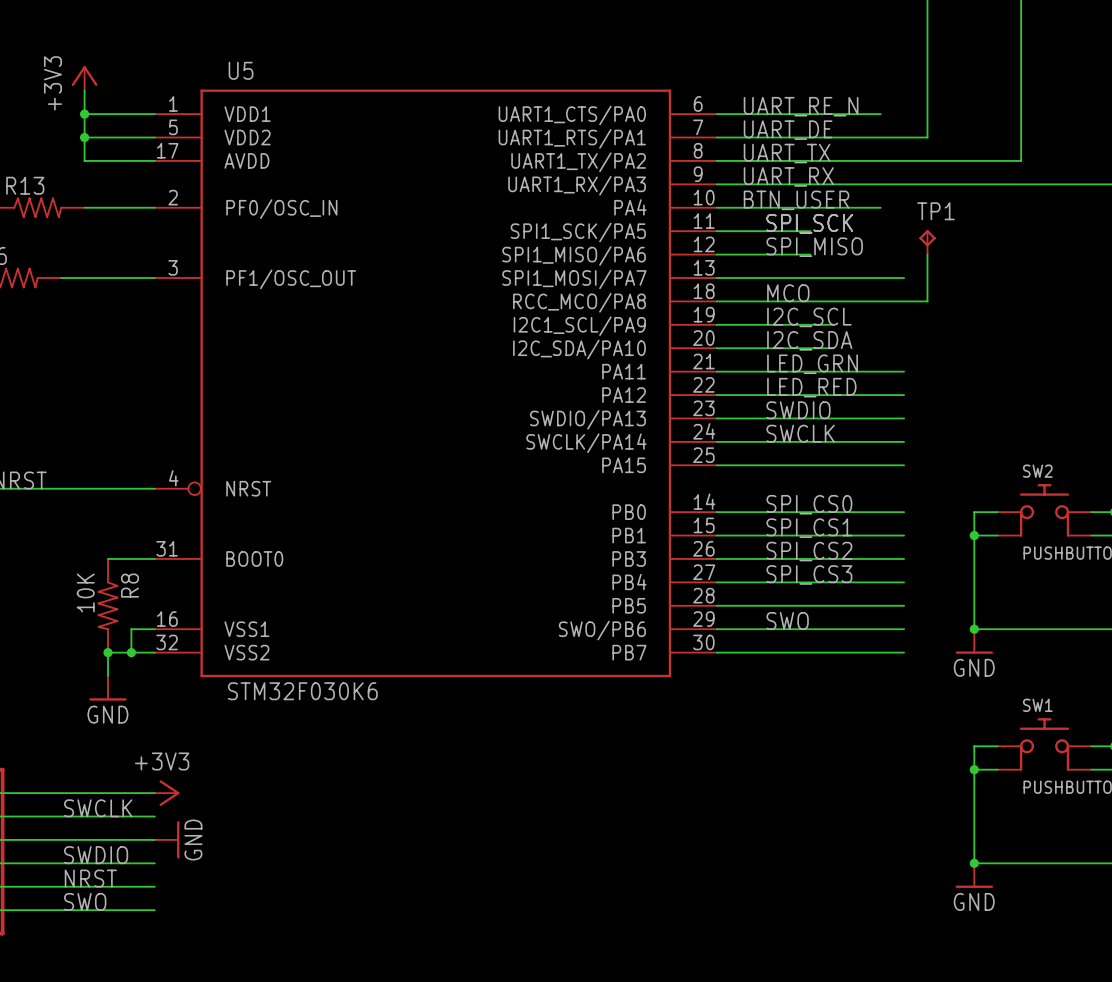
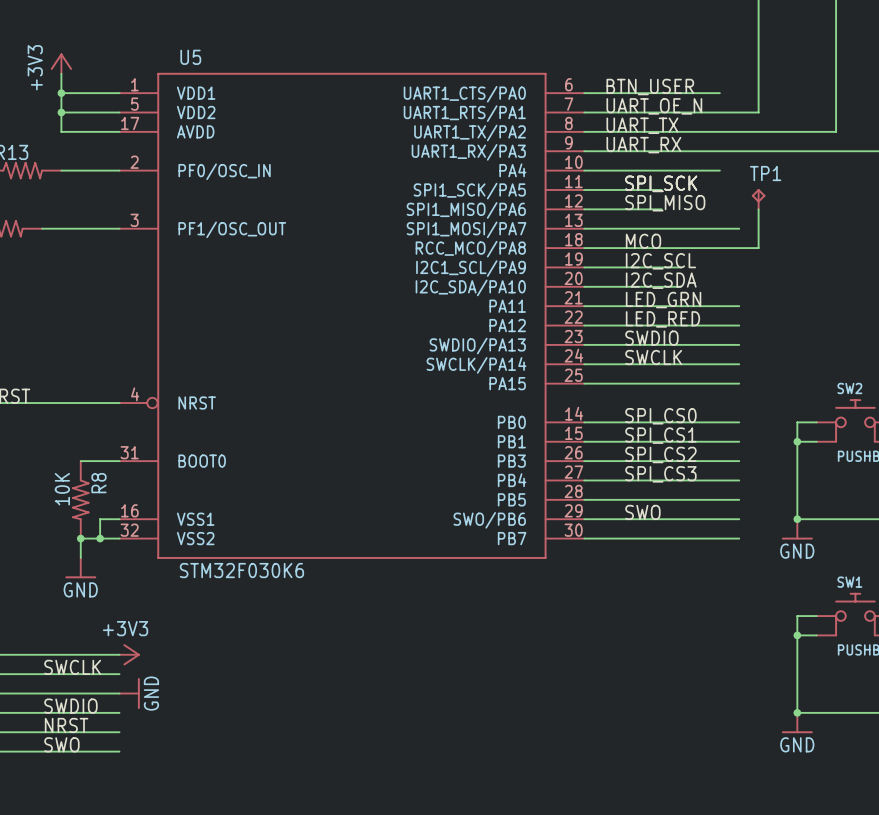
label: UART_RE_N (801, 106) -> BTN_USER (650, 87)
label: UART_DE (788, 130) -> UART_OE_N (654, 106)
label: BTN_USER (796, 200) -> none

